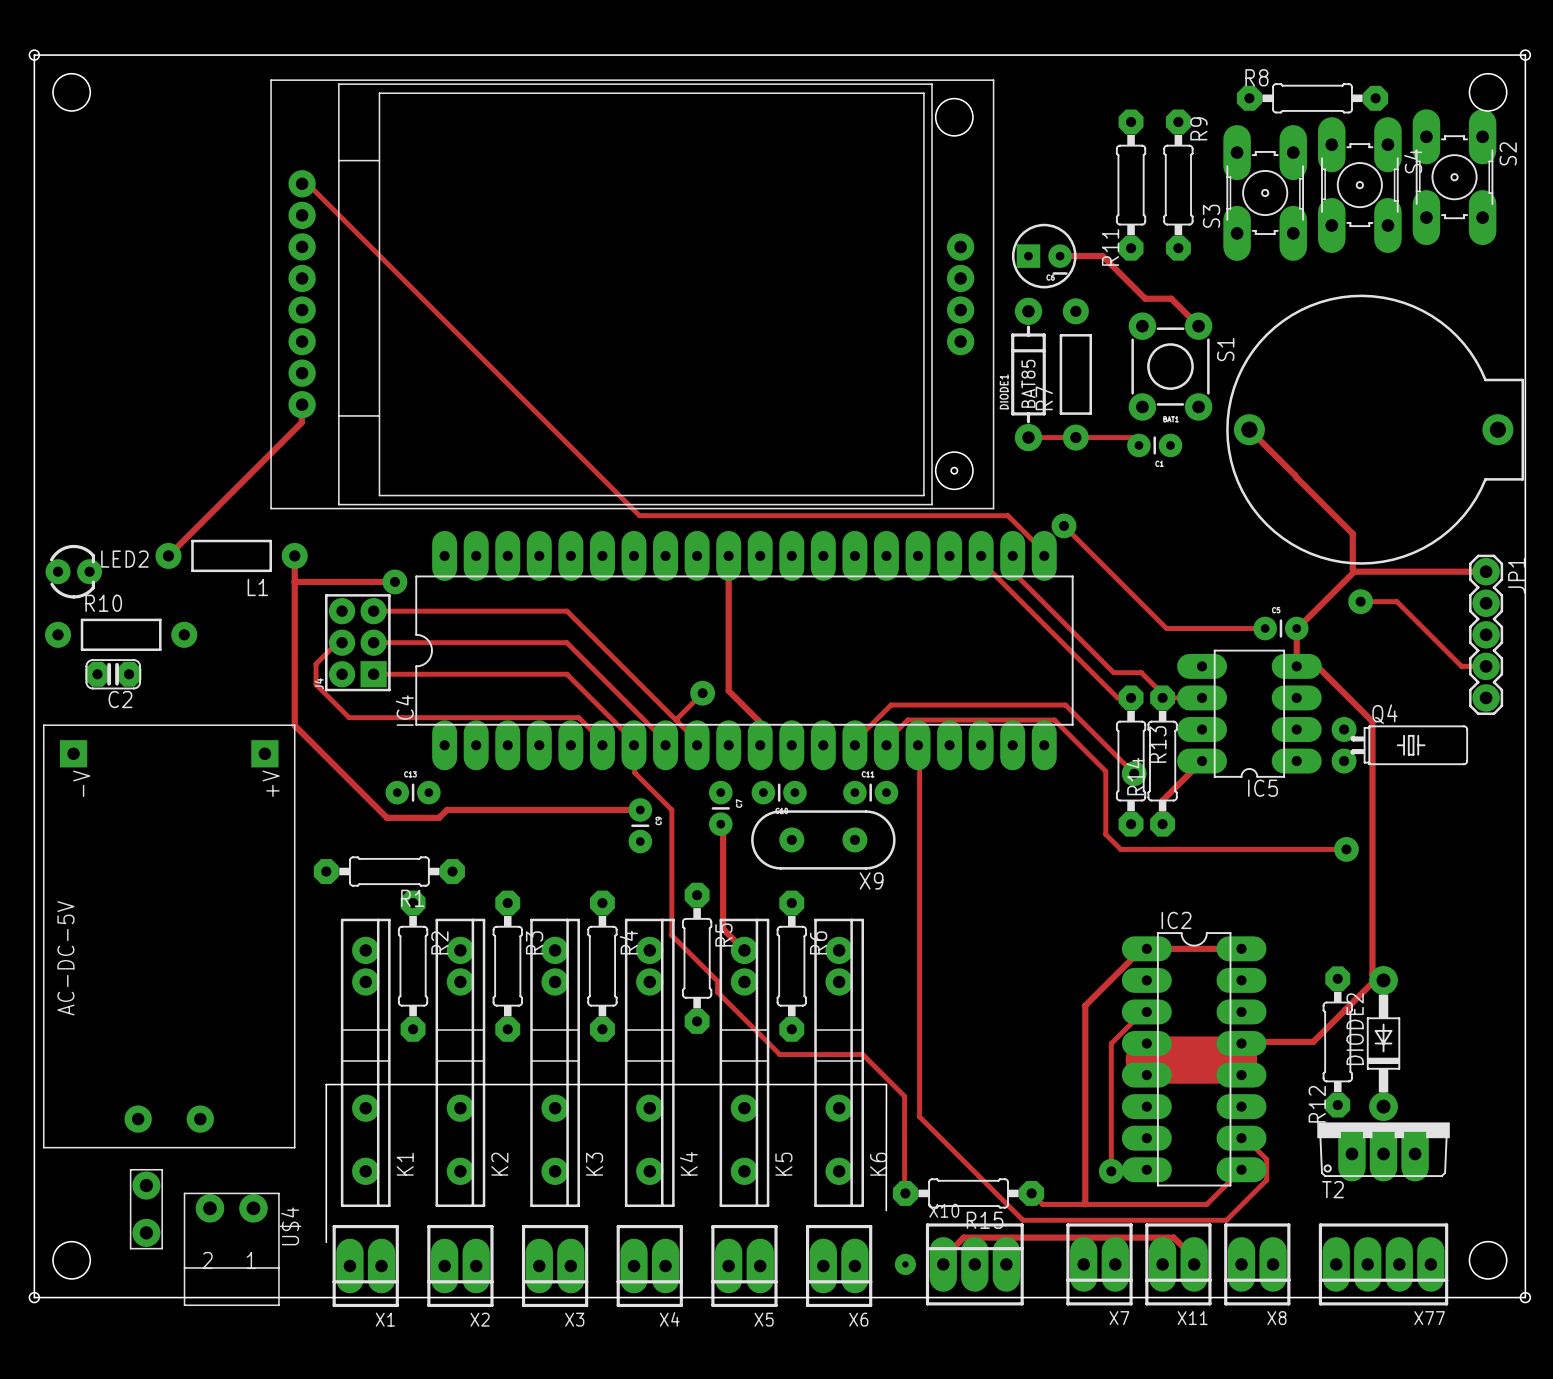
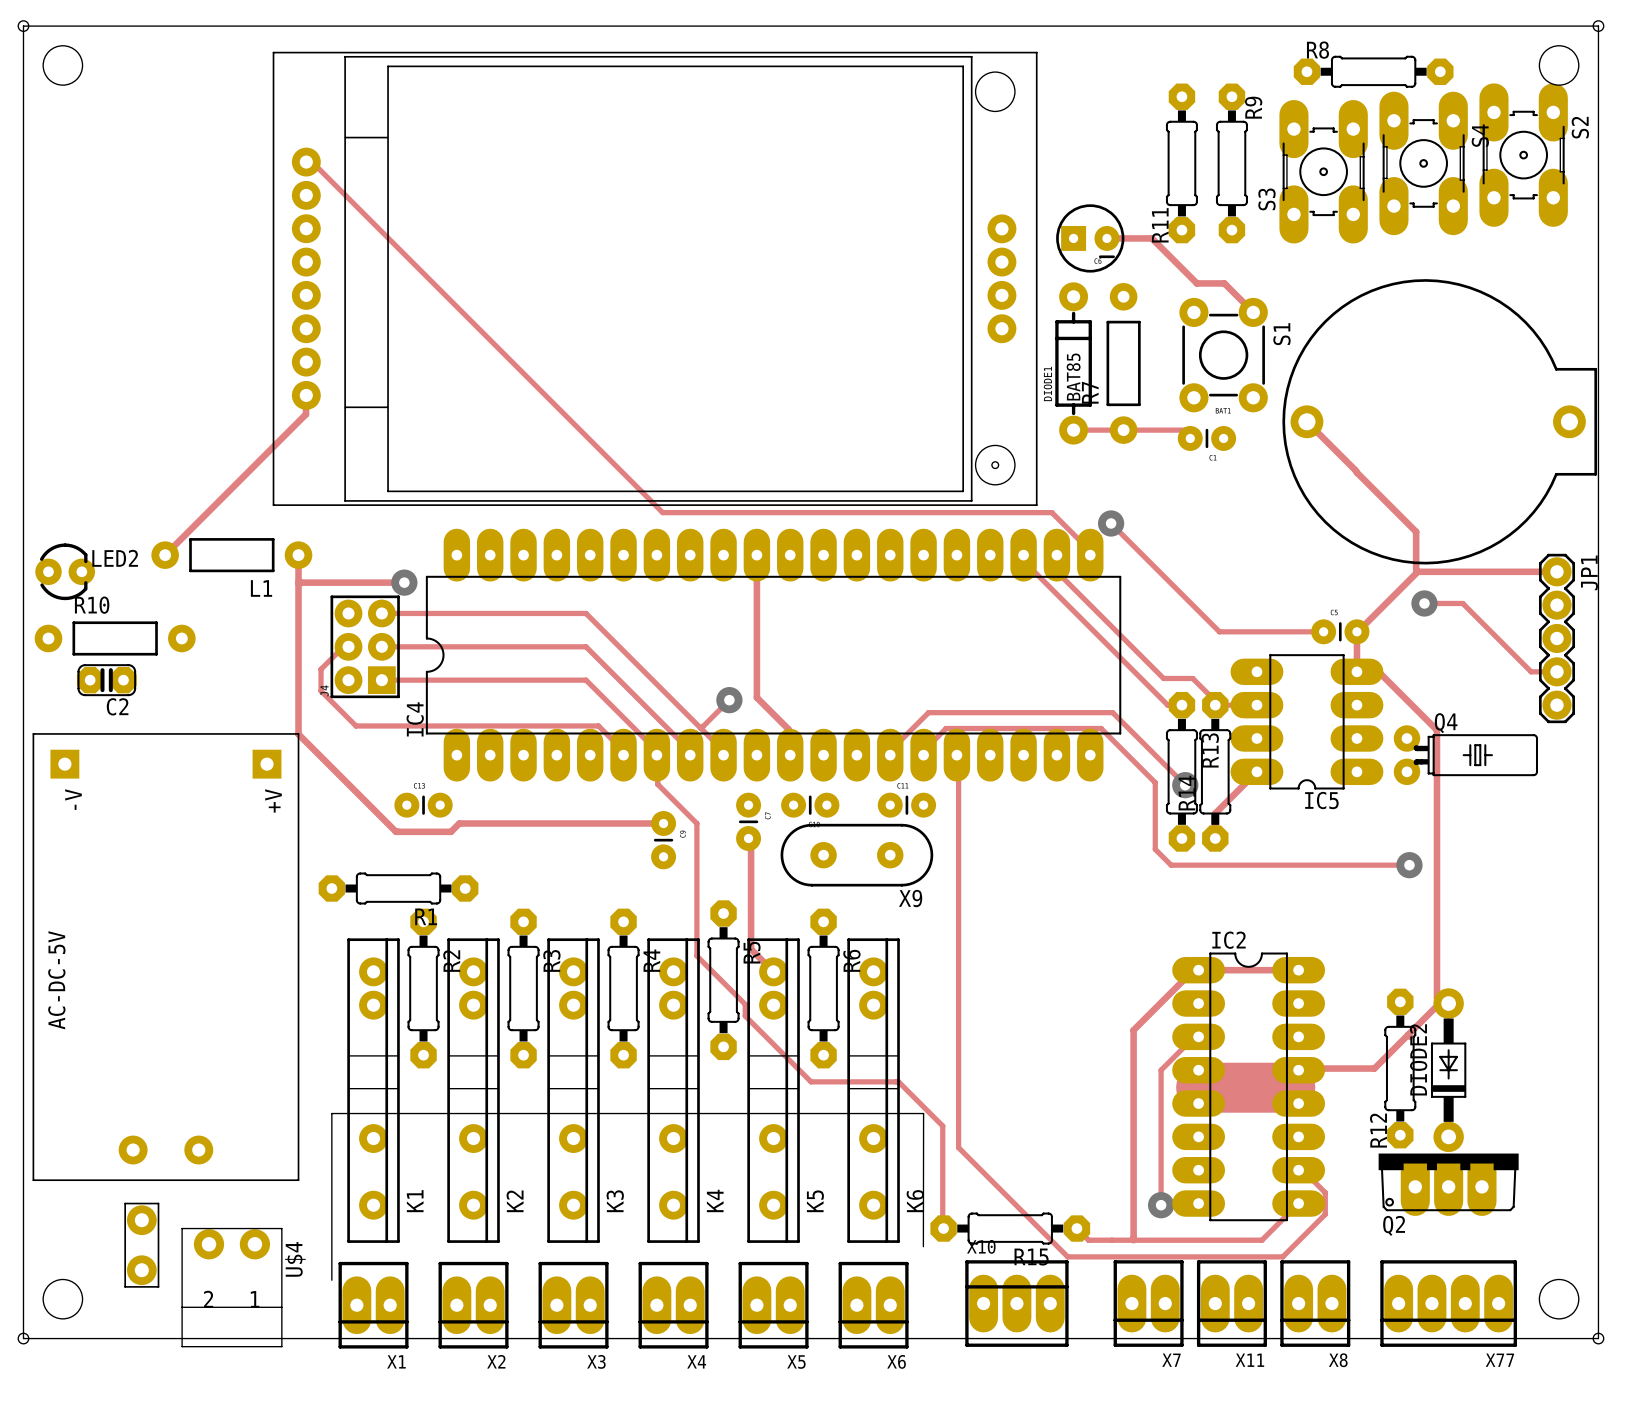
T2 name: T2 (1332, 1189) -> Q2 (1394, 1225)
via: (905, 1264) -> none
track: (943, 1264) (943, 1258) (963, 1237) (1173, 1237) (1194, 1258) (1194, 1264) -> none

